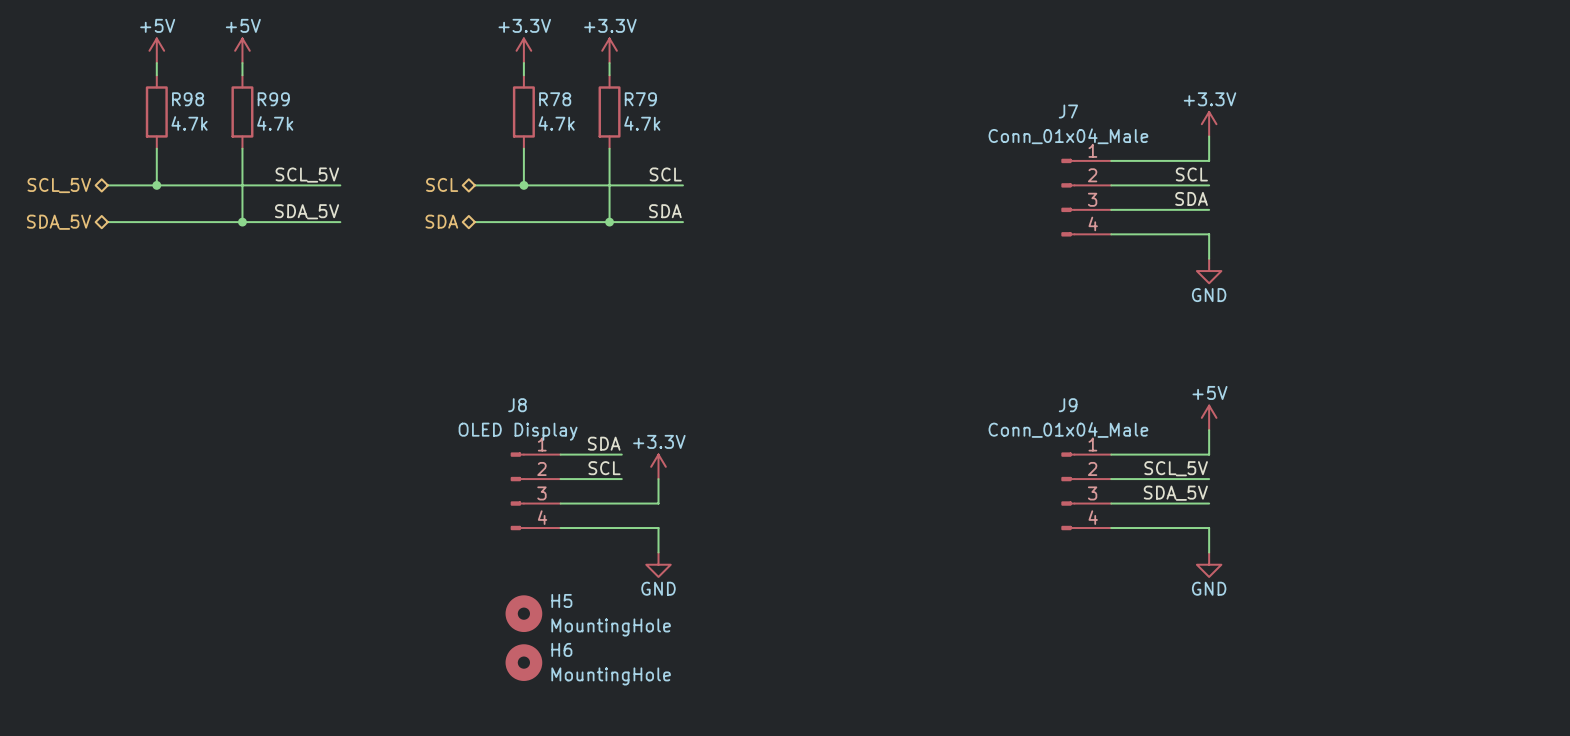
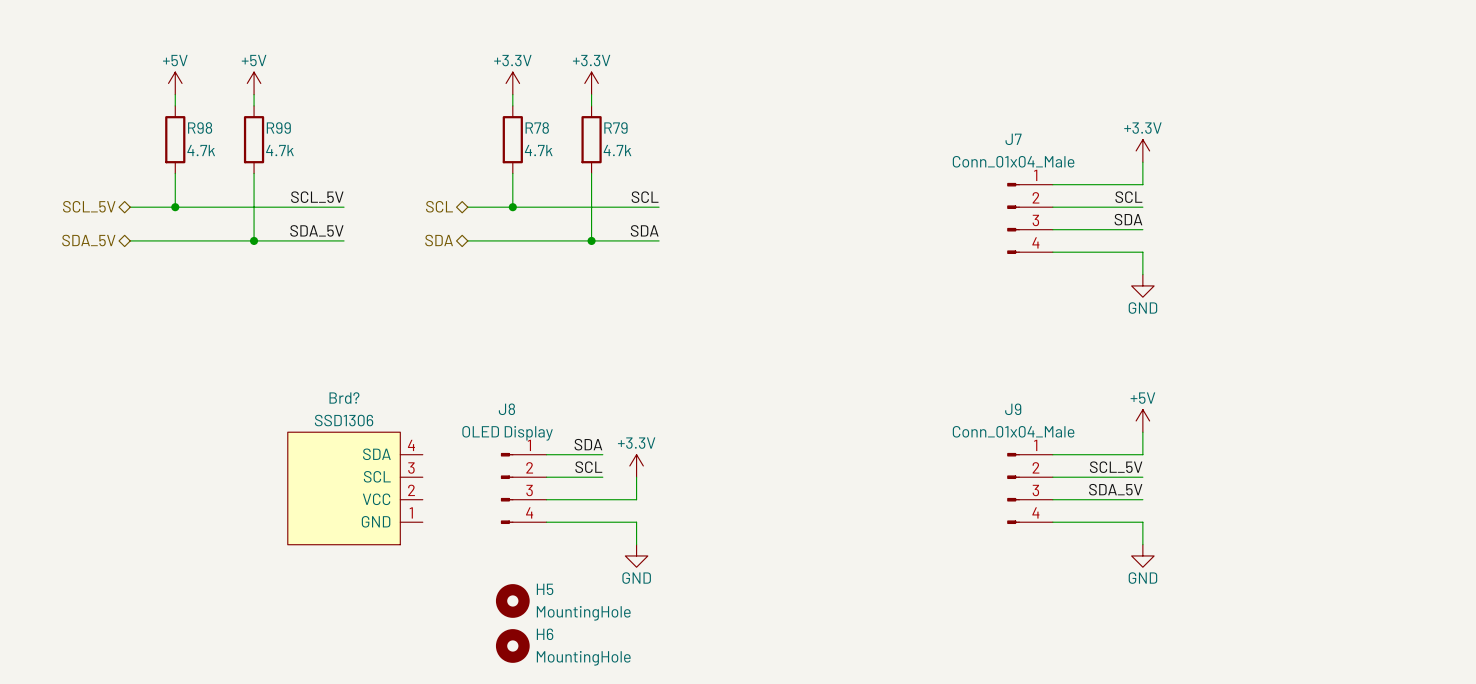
Brd?: none -> SSD1306 (355, 488)

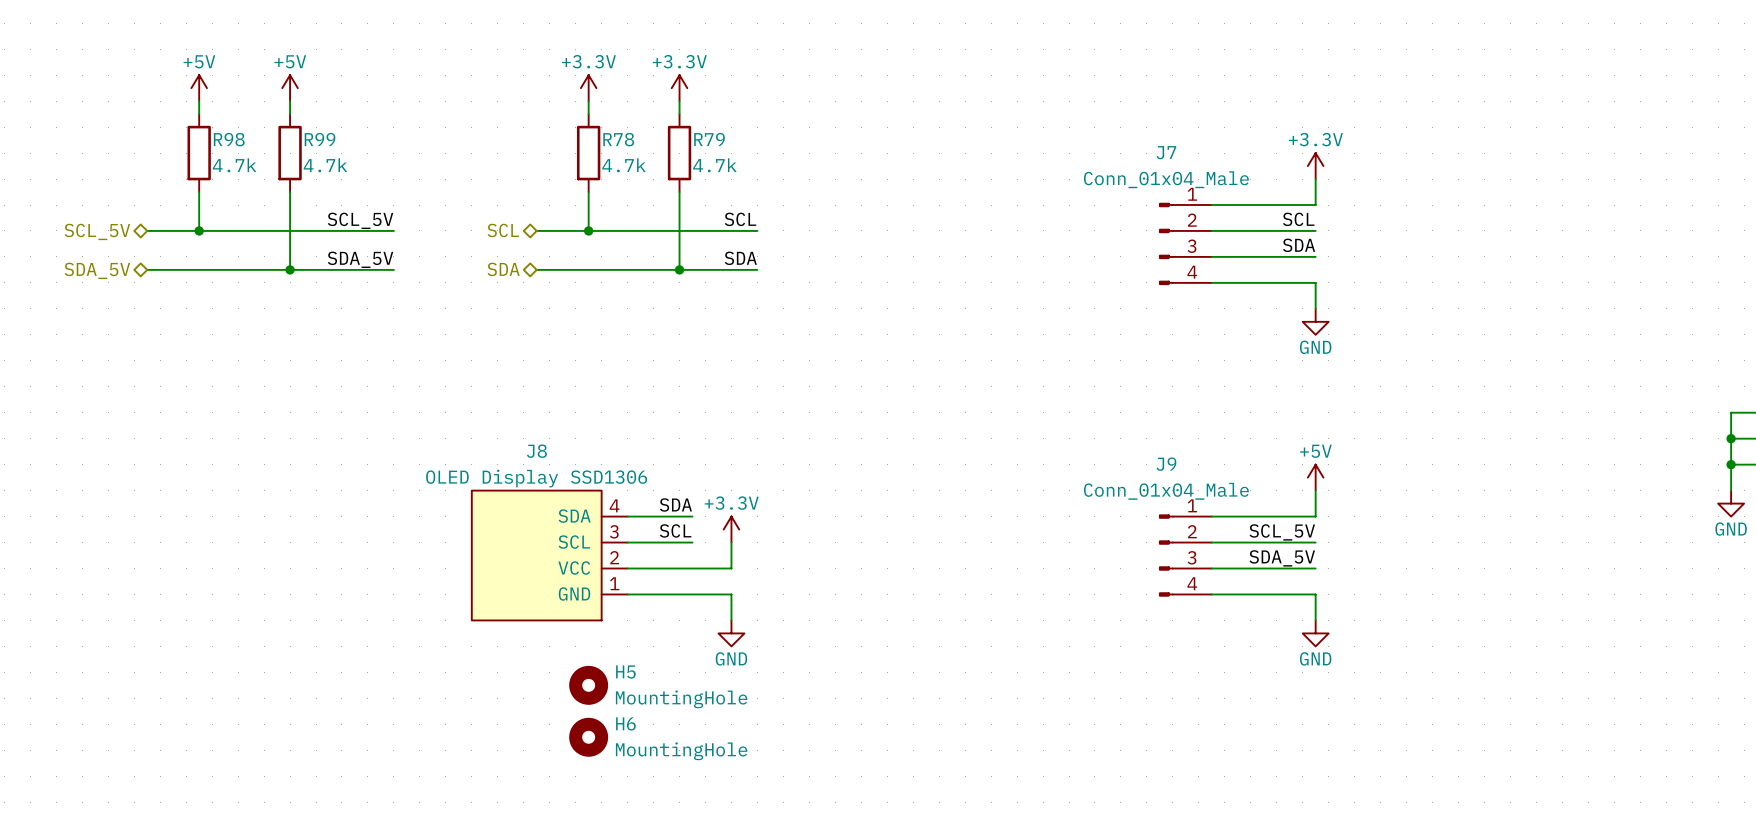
J8 value: OLED Display (507, 433) -> OLED Display SSD1306 (536, 478)
J8 symbol: [500, 452, 547, 525] -> [471, 490, 628, 621]
Brd?: SSD1306 (355, 488) -> none

